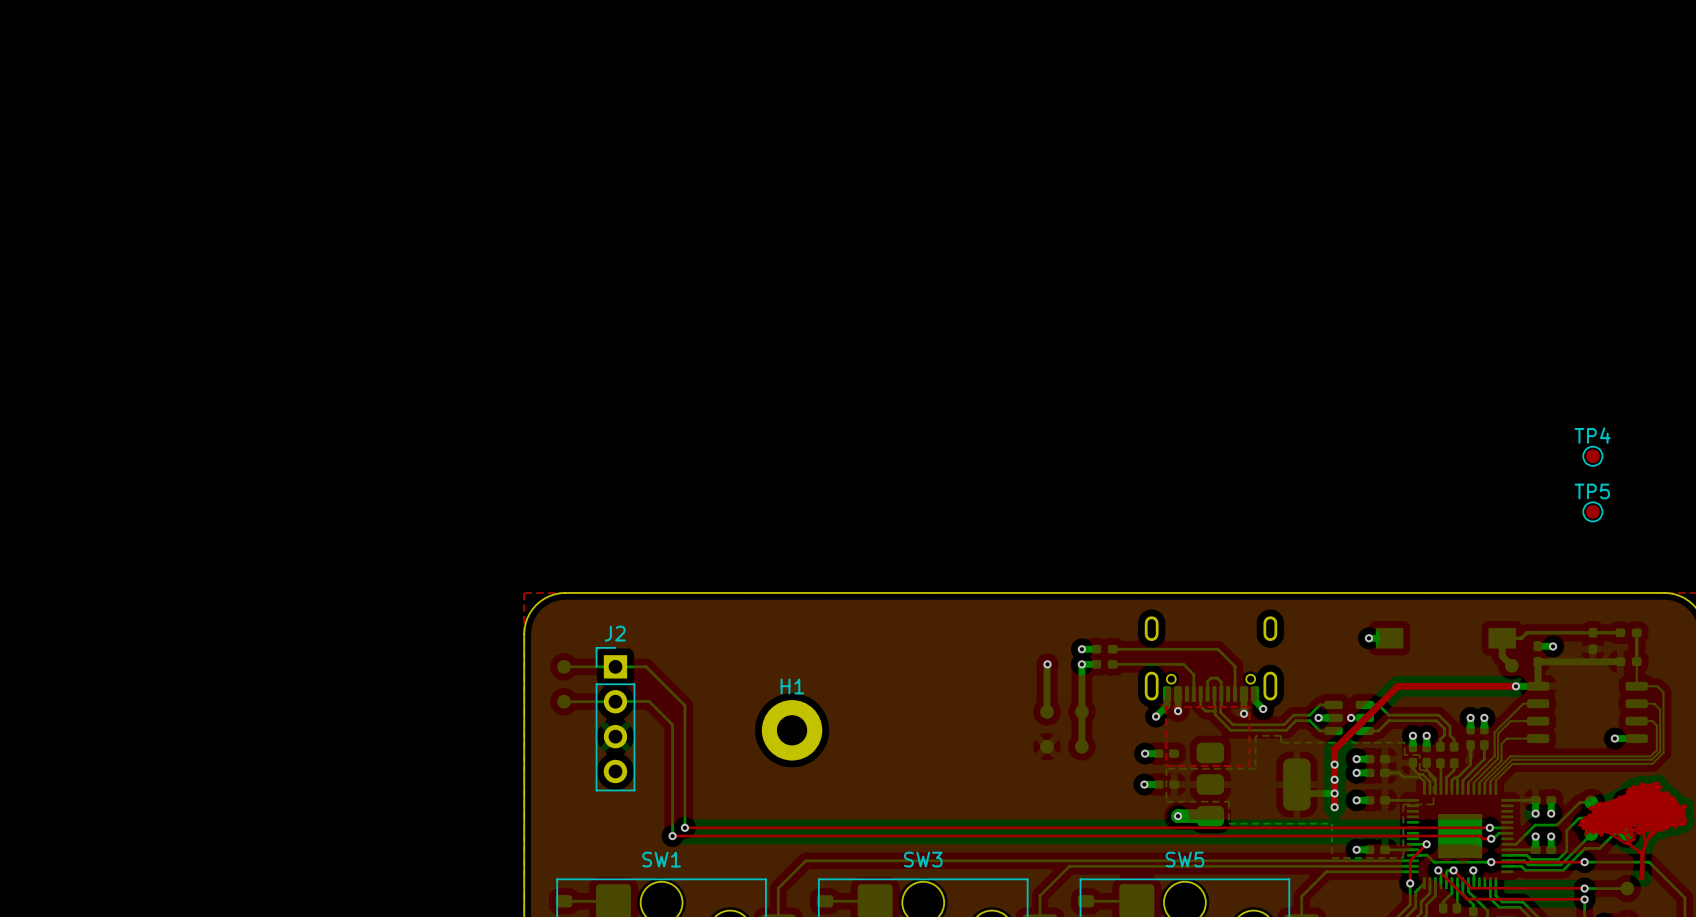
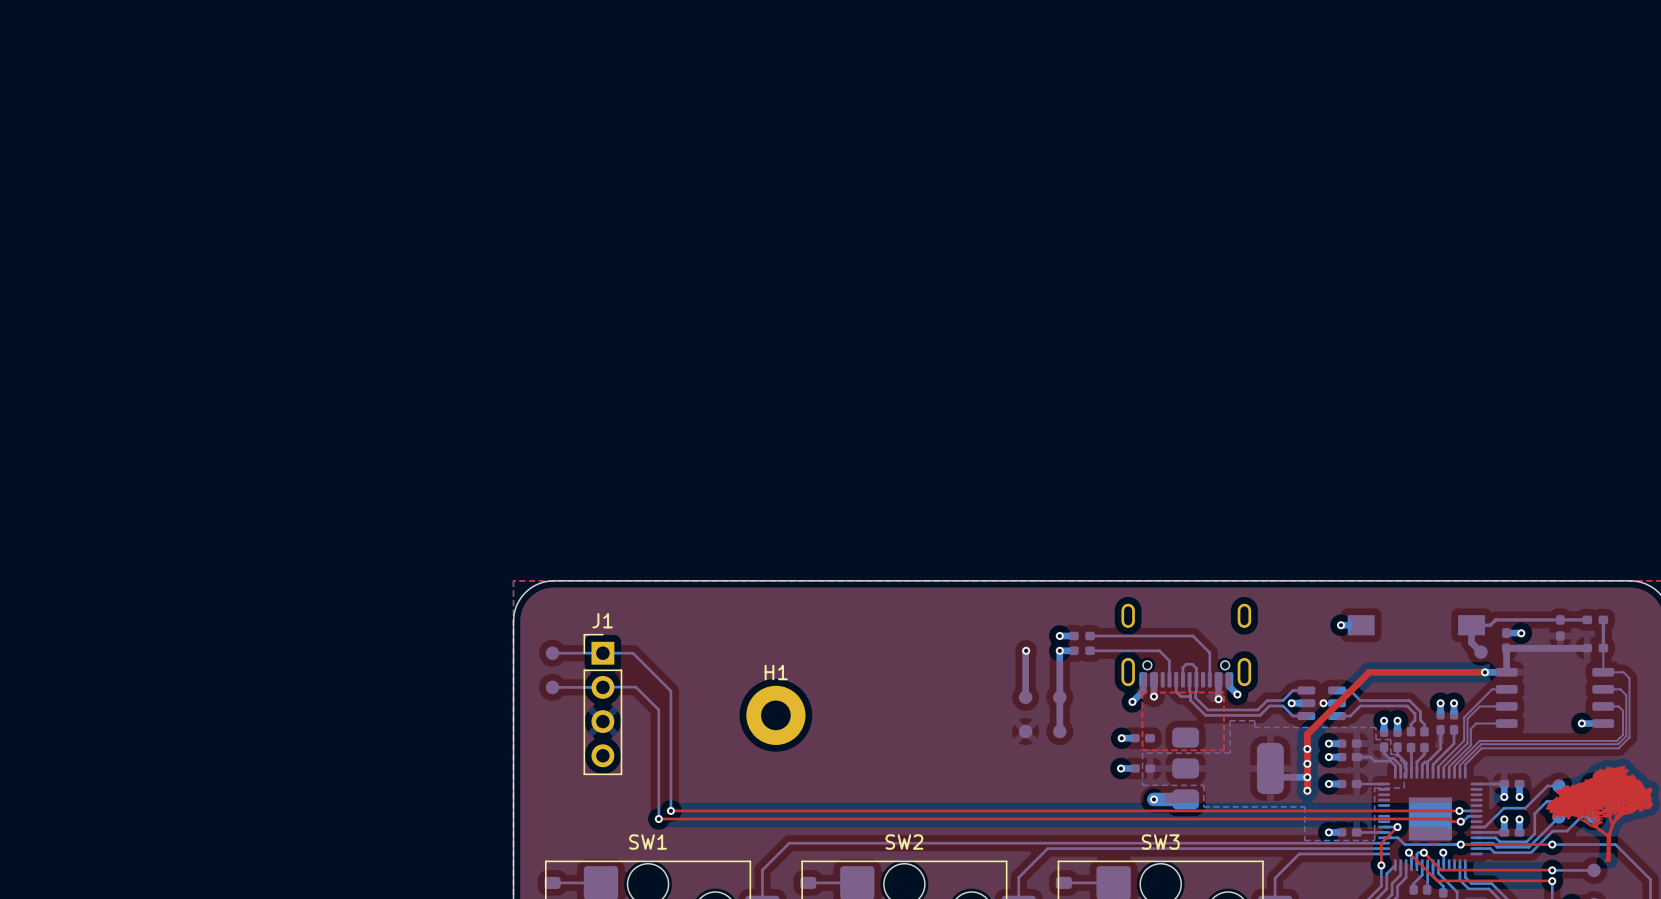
TP4: (1592, 456) -> none
TP5: (1592, 511) -> none
J2 name: J2 (615, 633) -> J1 (602, 620)
SW3 name: SW3 (923, 859) -> SW2 (904, 842)
SW5 name: SW5 (1184, 859) -> SW3 (1160, 842)

